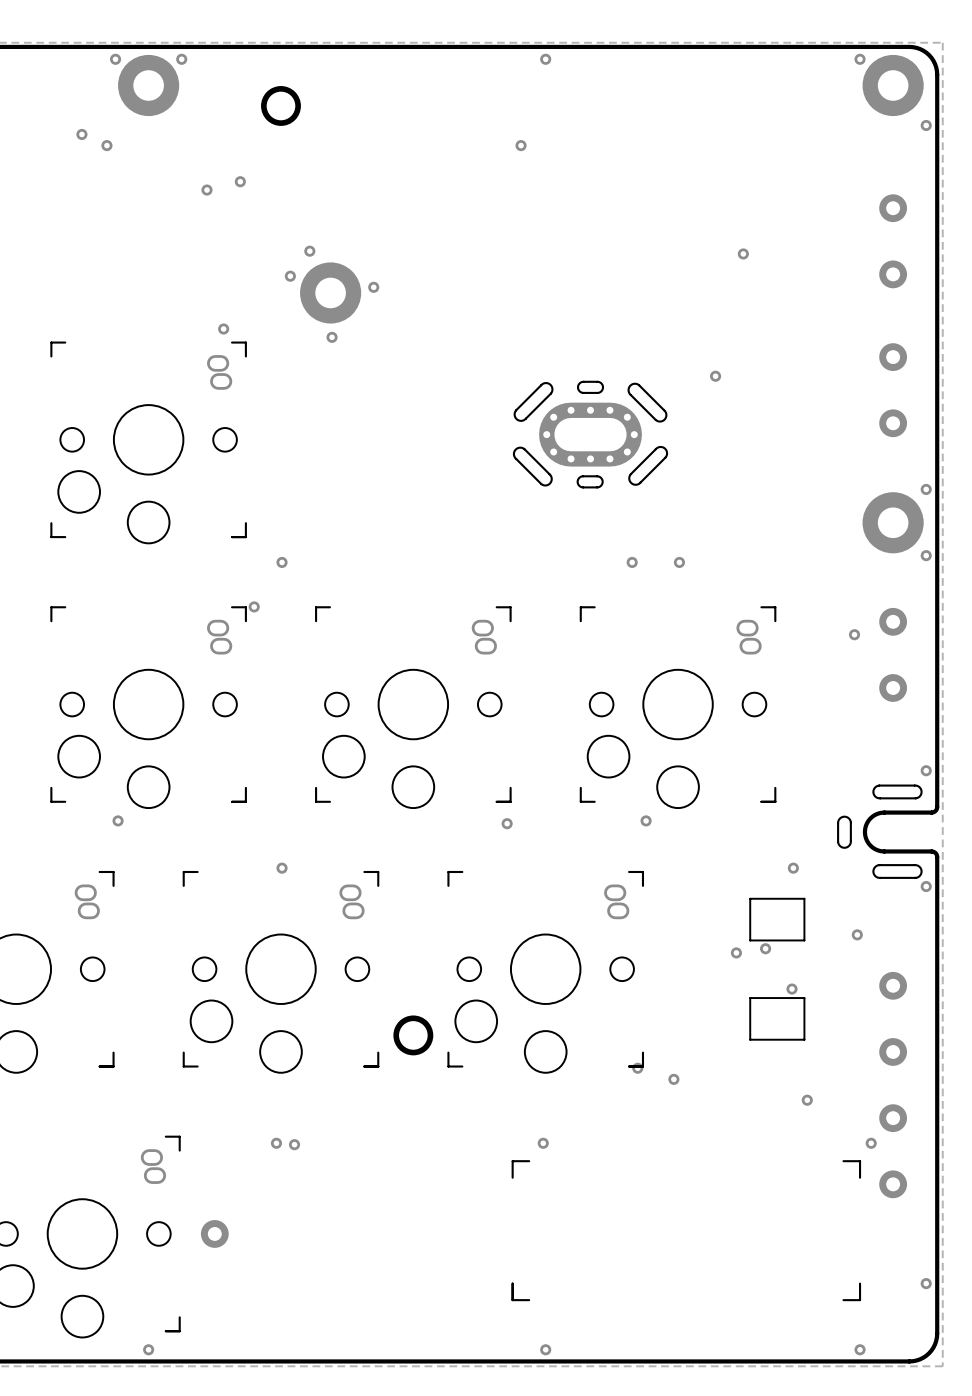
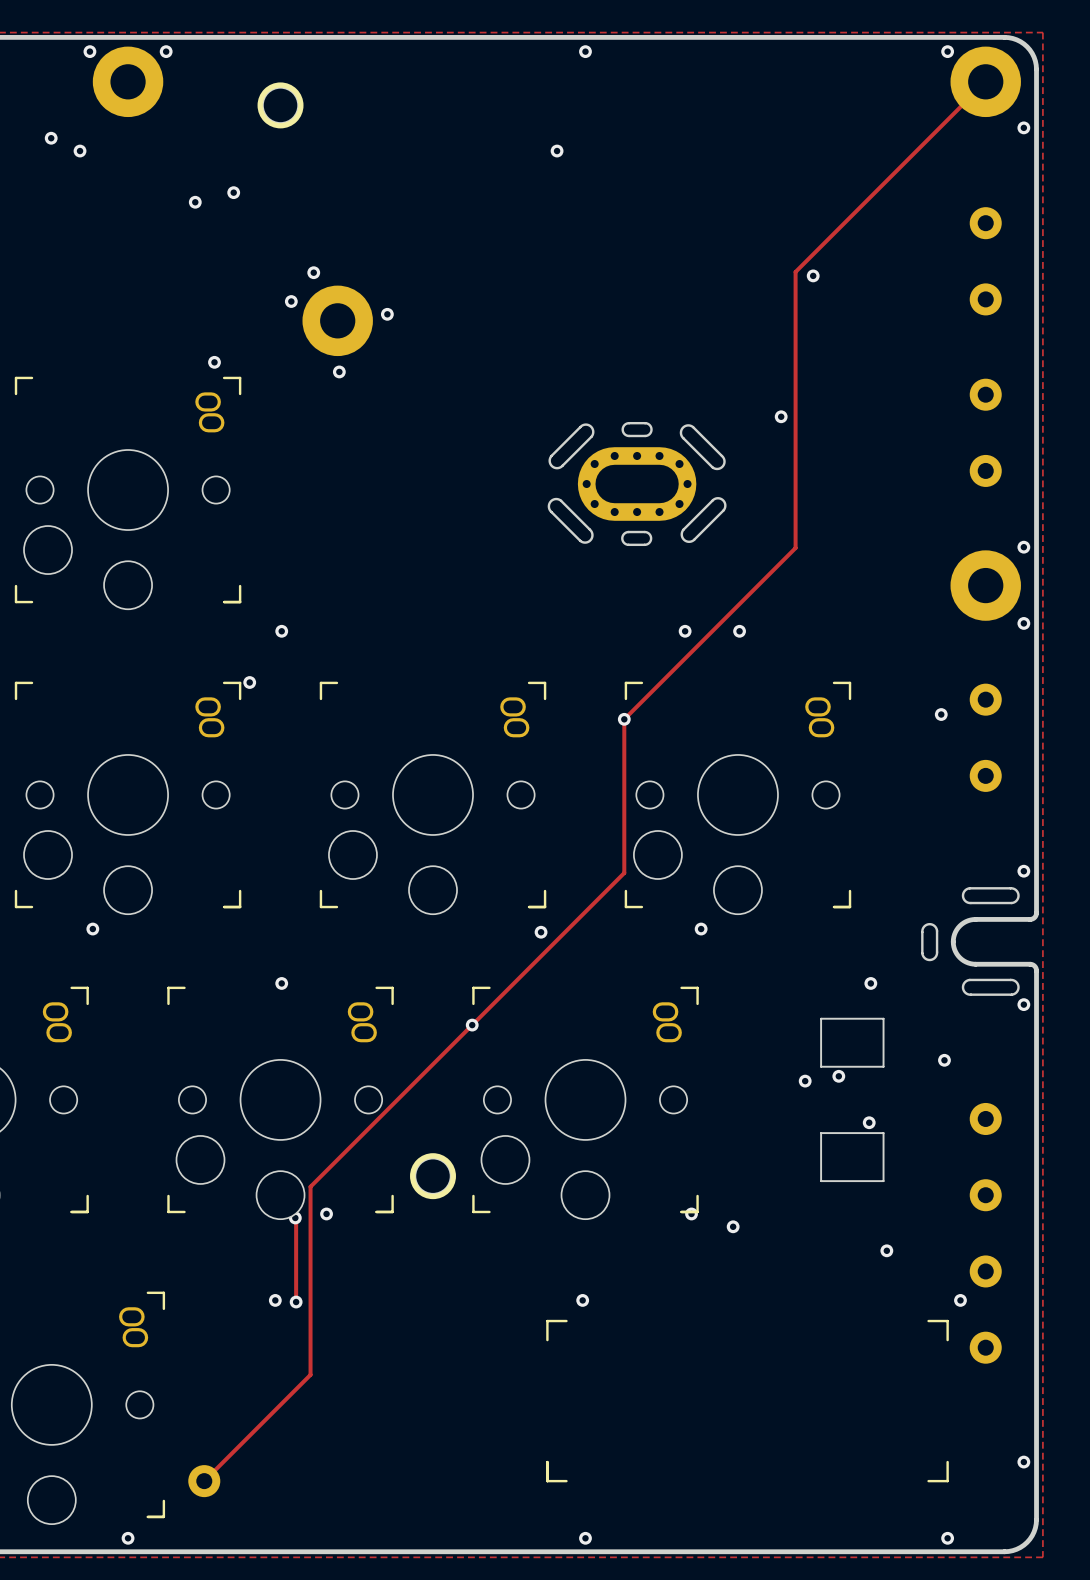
track: none -> (985, 81) (795, 271) (795, 548) (624, 719) (624, 873) (310, 1186) (310, 1374) (204, 1481)
via: none -> (624, 719)
via: none -> (472, 1025)
via: none -> (326, 1213)
track: none -> (295, 1217) (296, 1302)
via: none -> (295, 1217)
part position: (214, 1233) -> (204, 1481)

